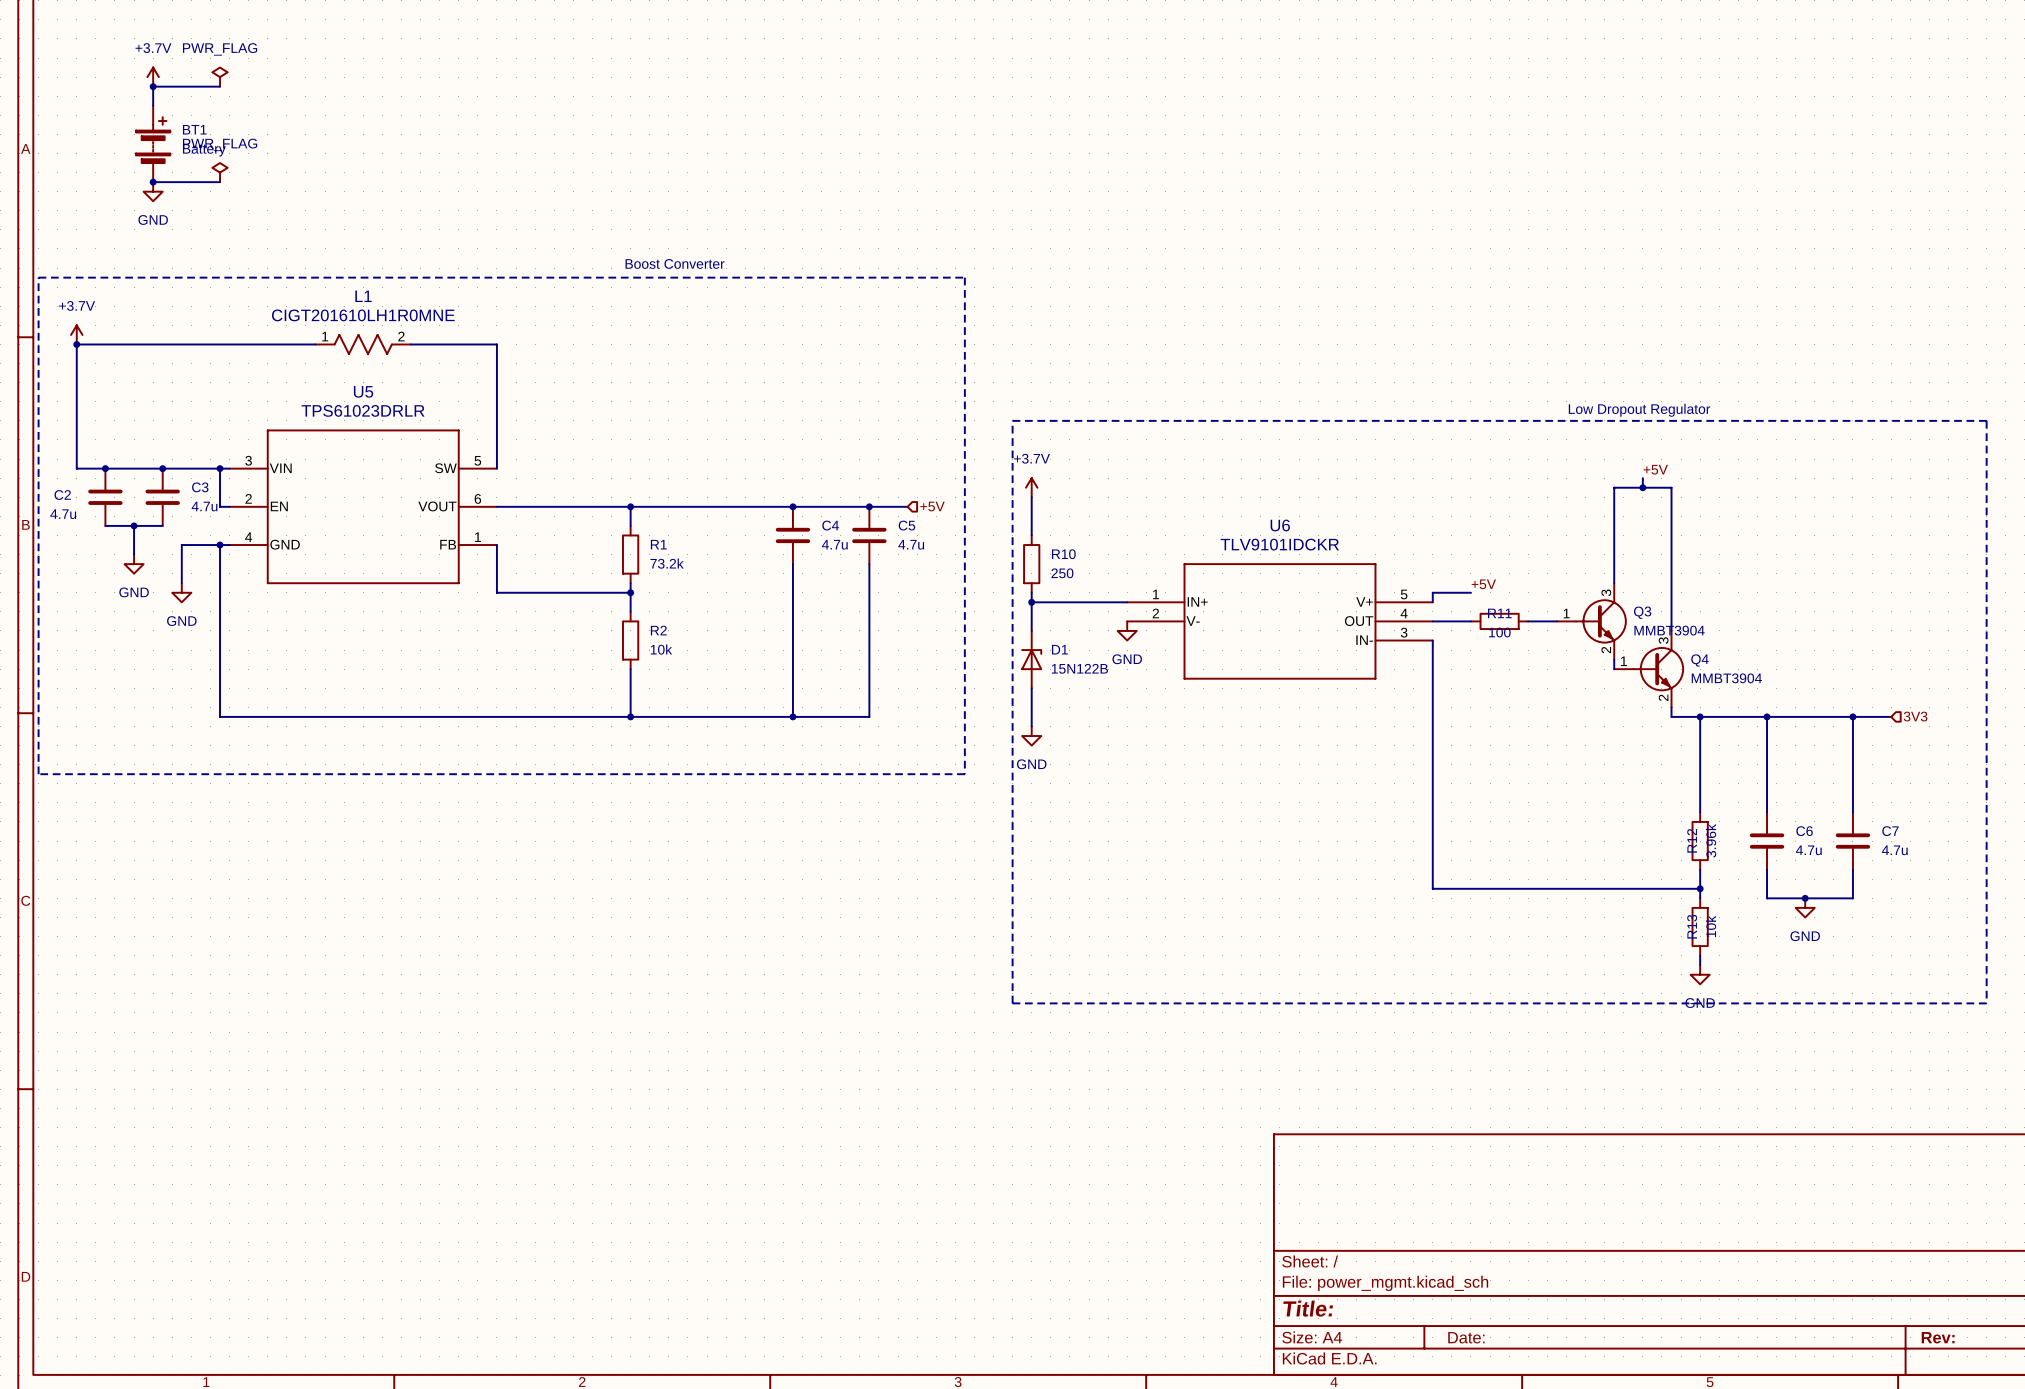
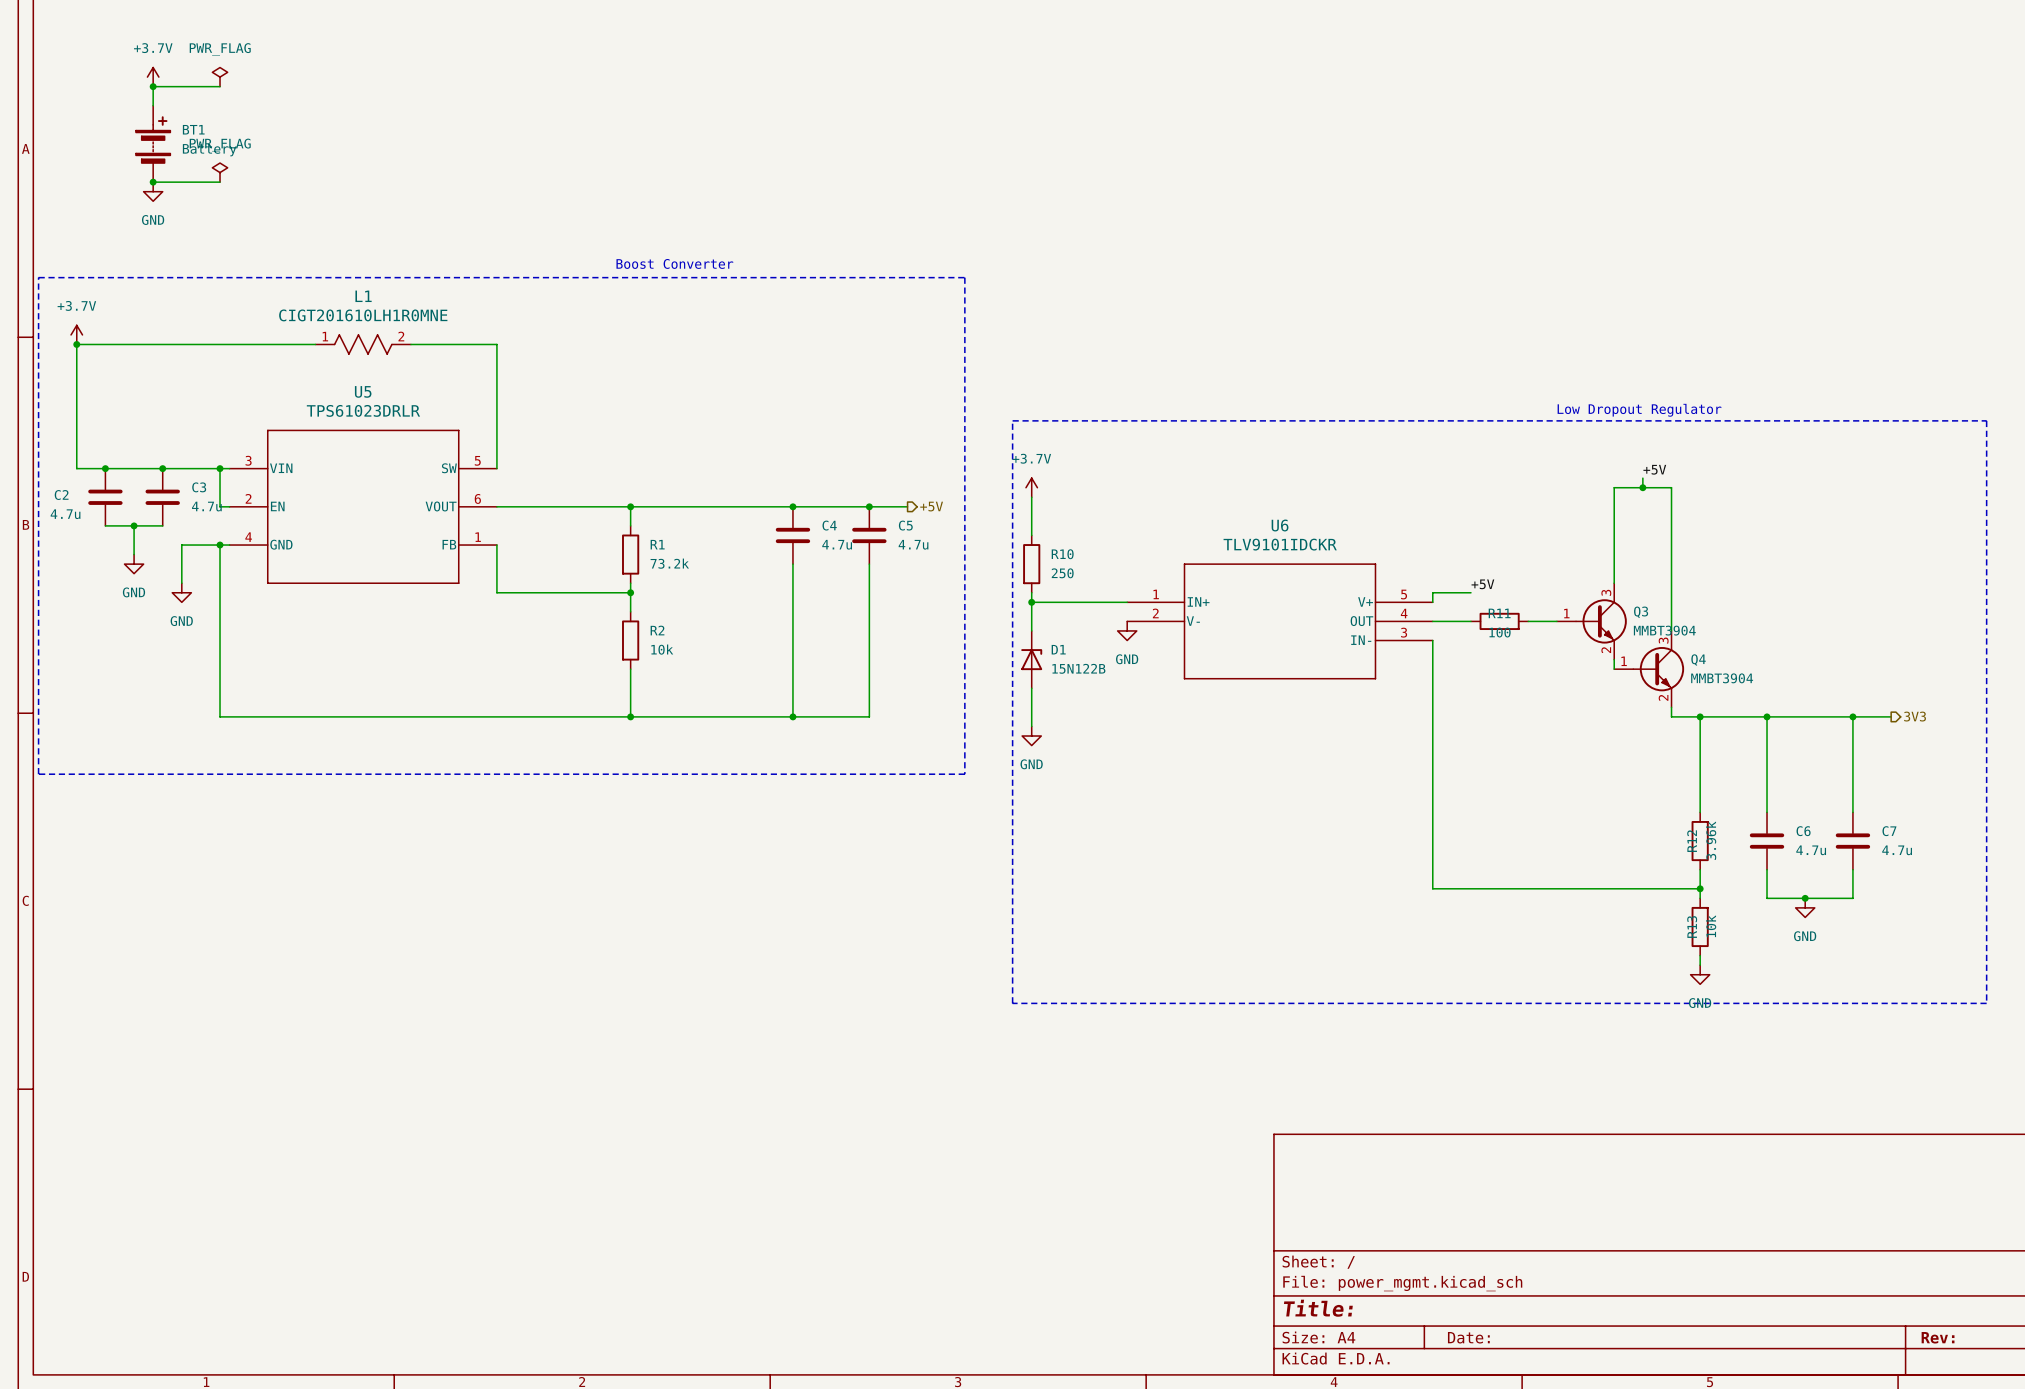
hierarchical label shape: input (932, 506) -> output (931, 506)
hierarchical label shape: input (1915, 716) -> output (1915, 716)

